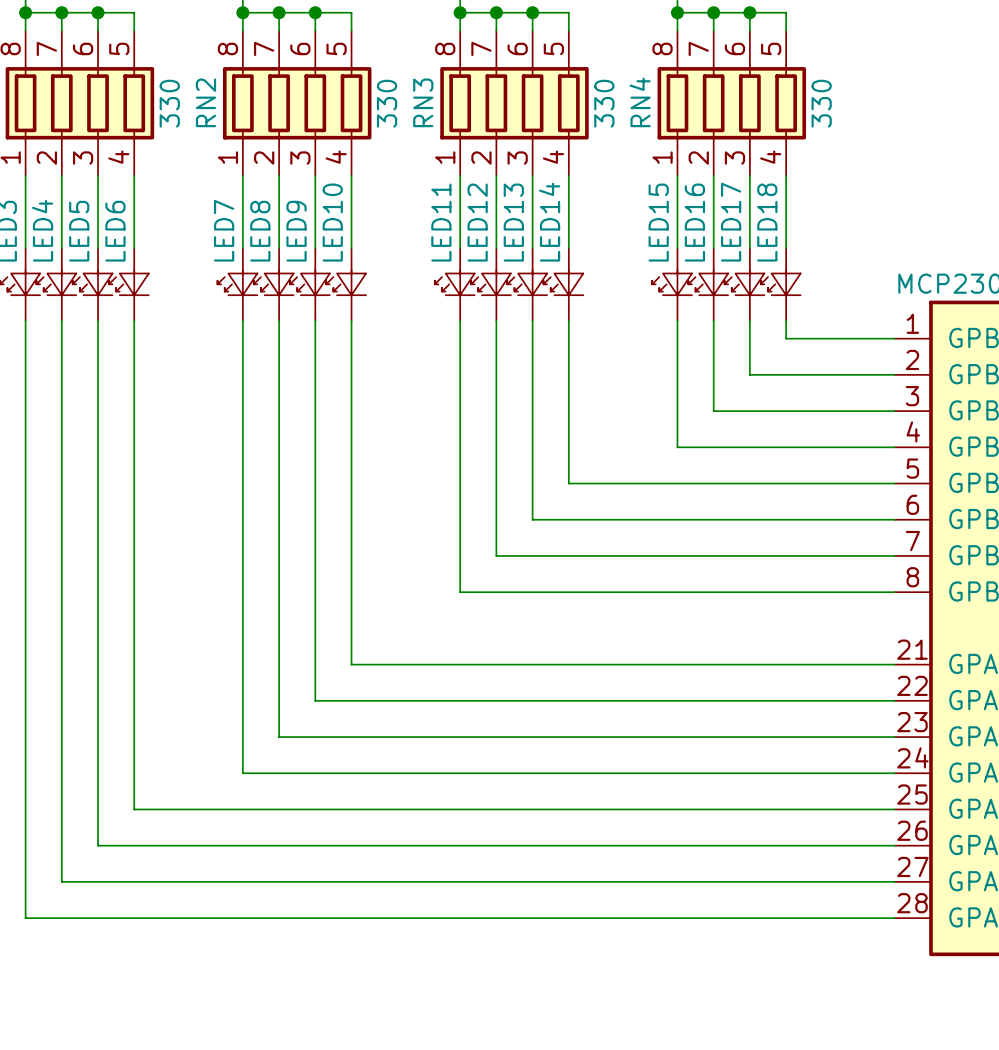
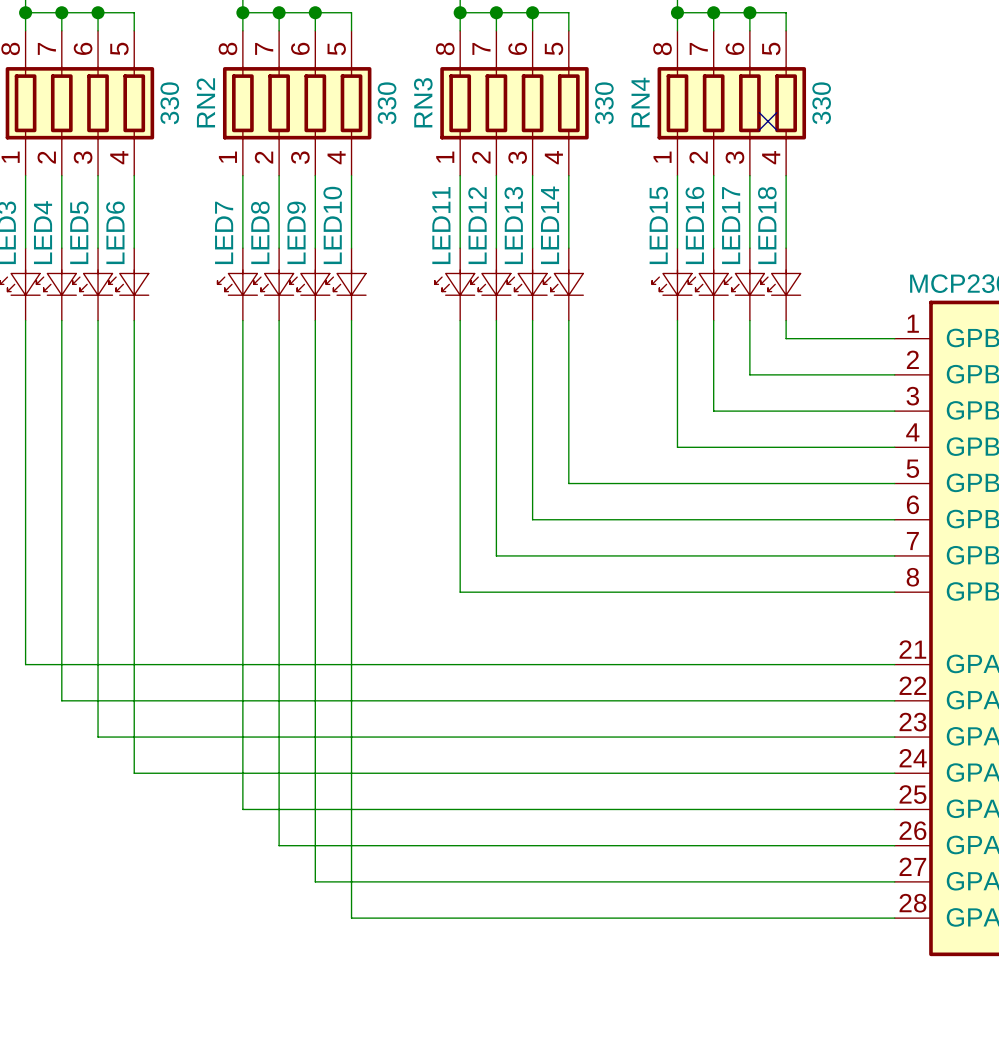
no-connect mark: none -> (768, 121)
wire: (25, 664) (25, 918) (351, 918) -> (25, 664) (351, 664) (351, 918)
wire: (61, 700) (61, 881) (315, 881) -> (61, 700) (315, 700) (315, 881)
wire: (98, 737) (98, 845) (279, 845) -> (98, 737) (279, 737) (279, 845)
wire: (134, 773) (134, 809) (242, 809) -> (134, 773) (242, 773) (242, 809)

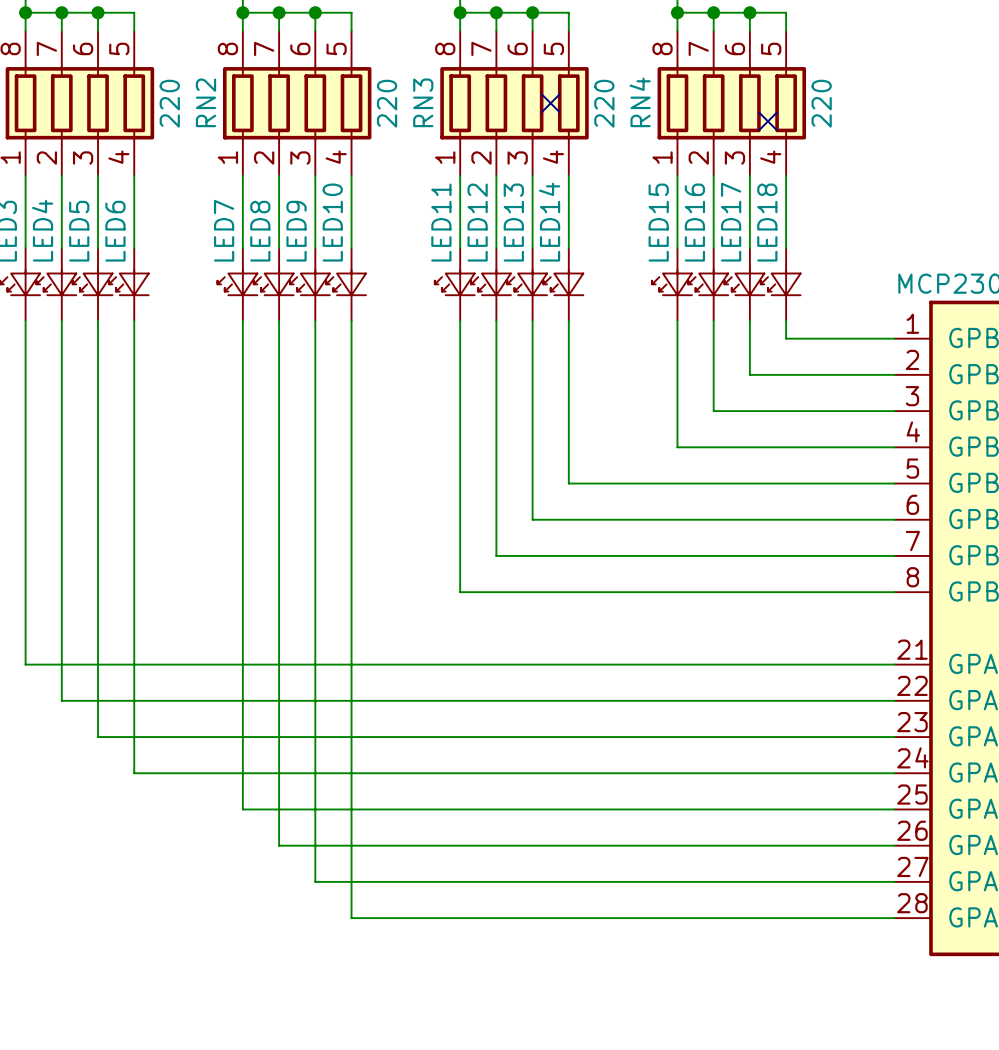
part value: 330 (169, 103) -> 220 (169, 103)
RN2 value: 330 (387, 103) -> 220 (387, 103)
no-connect mark: none -> (550, 103)
RN3 value: 330 (604, 103) -> 220 (604, 103)
RN4 value: 330 (821, 103) -> 220 (821, 103)

